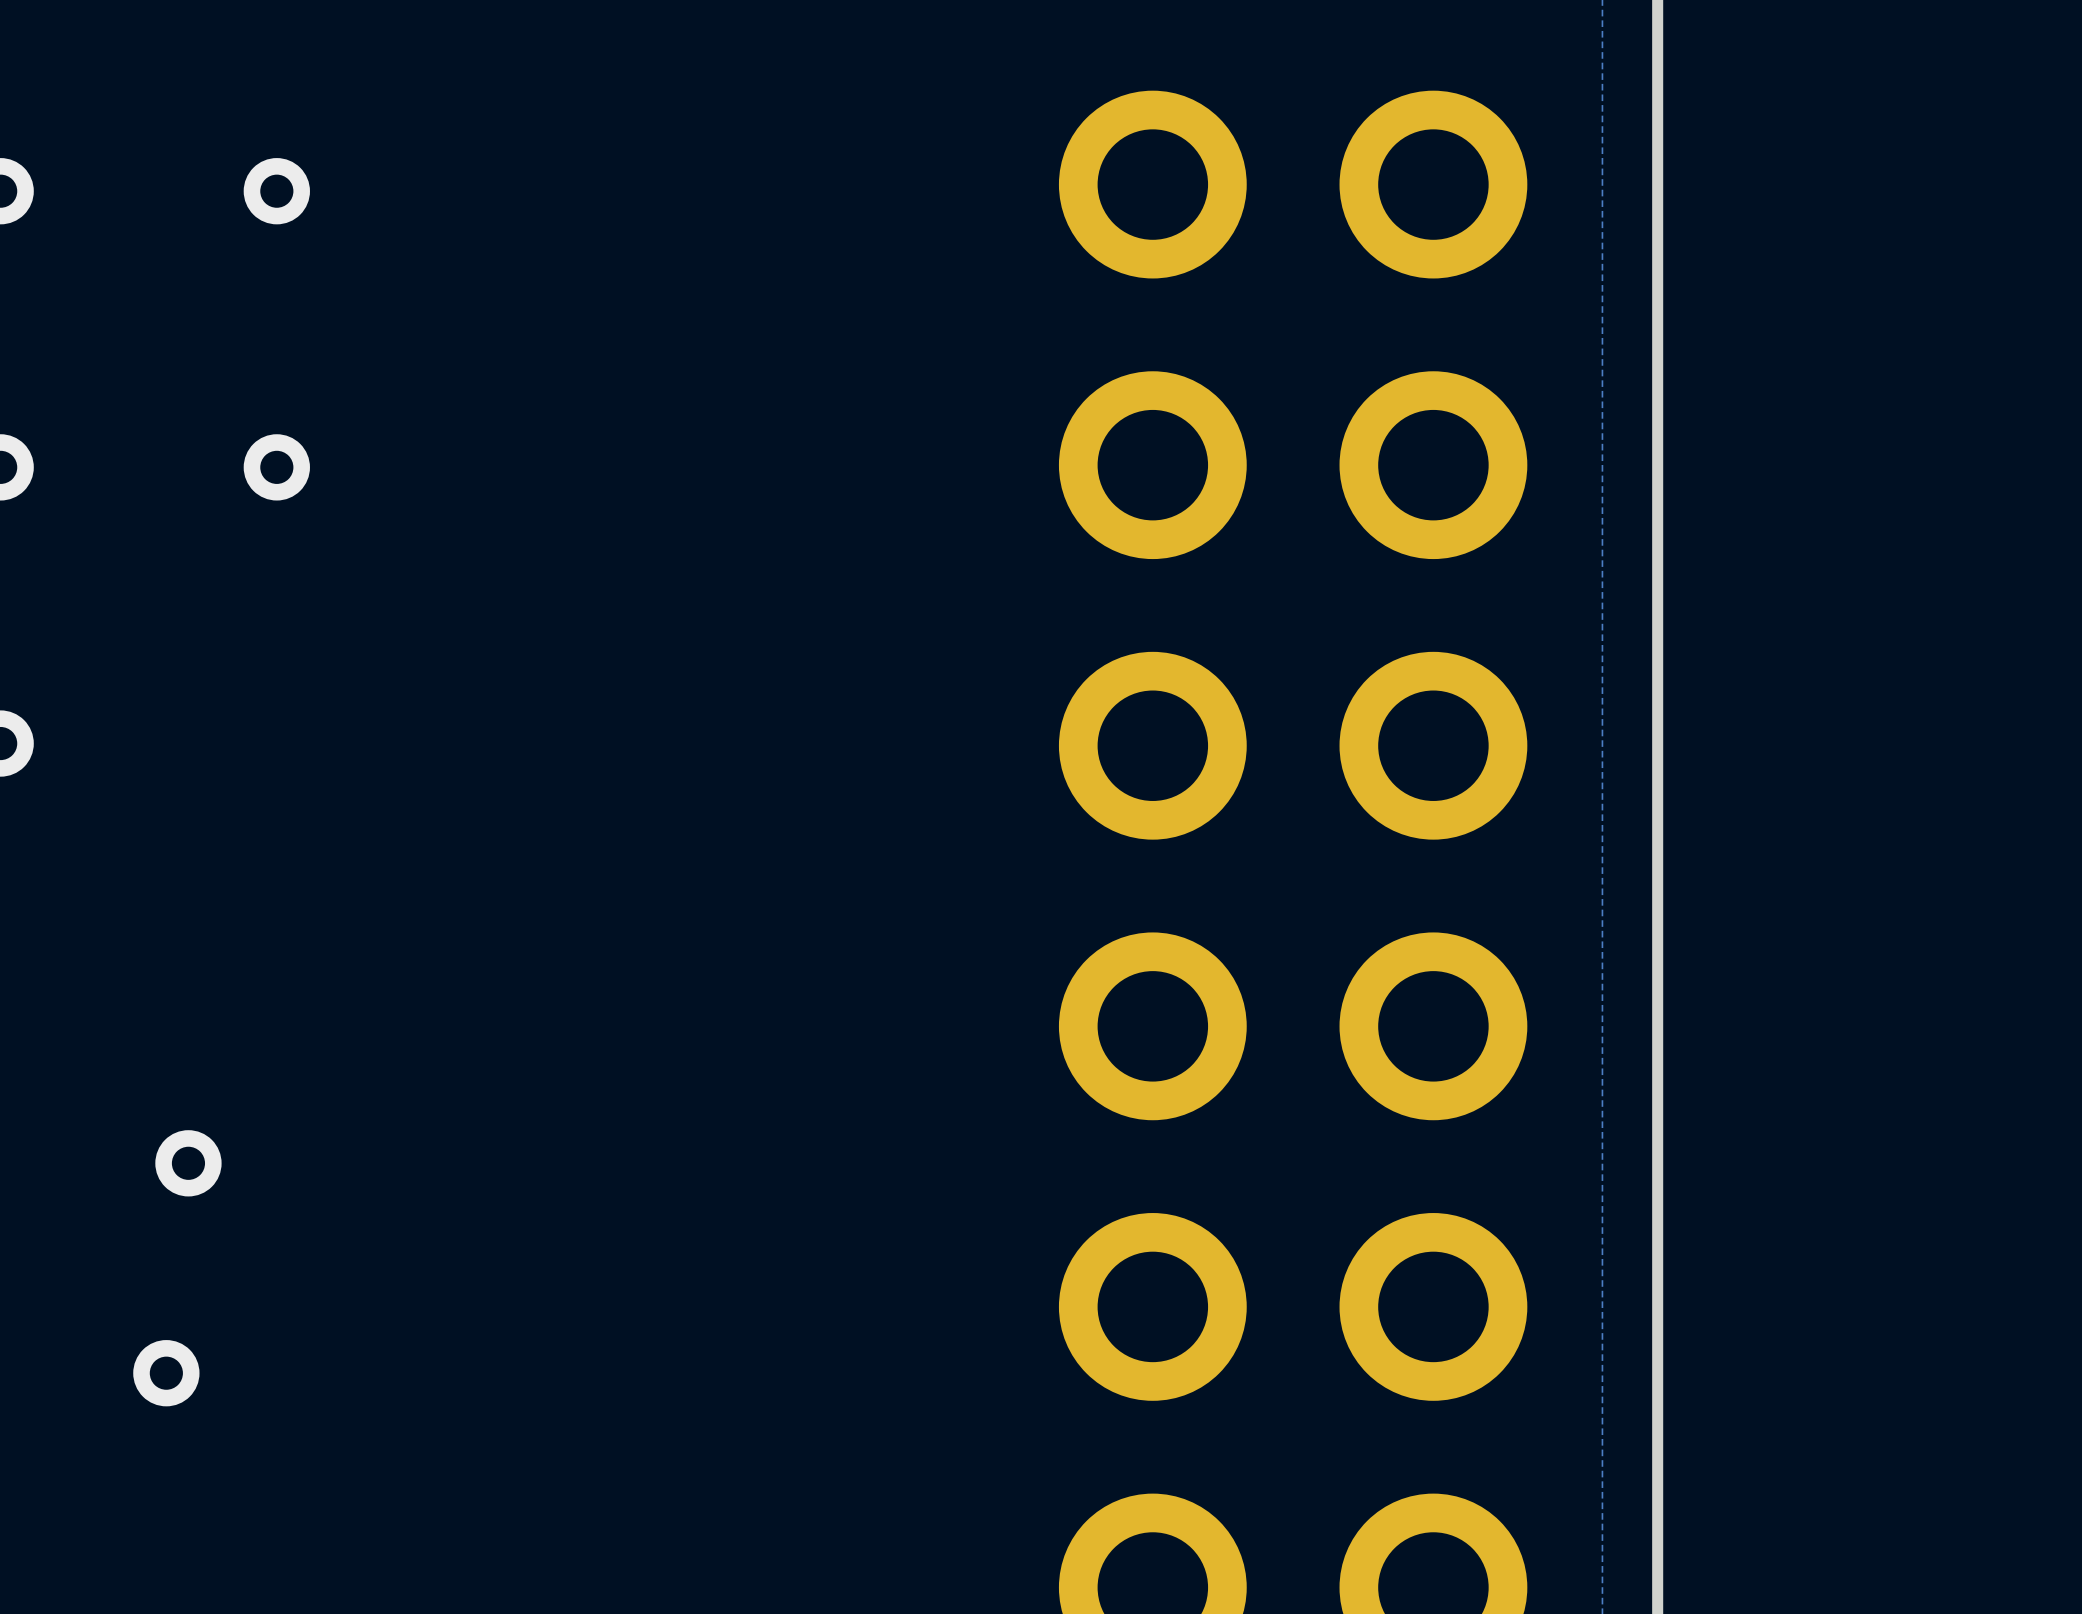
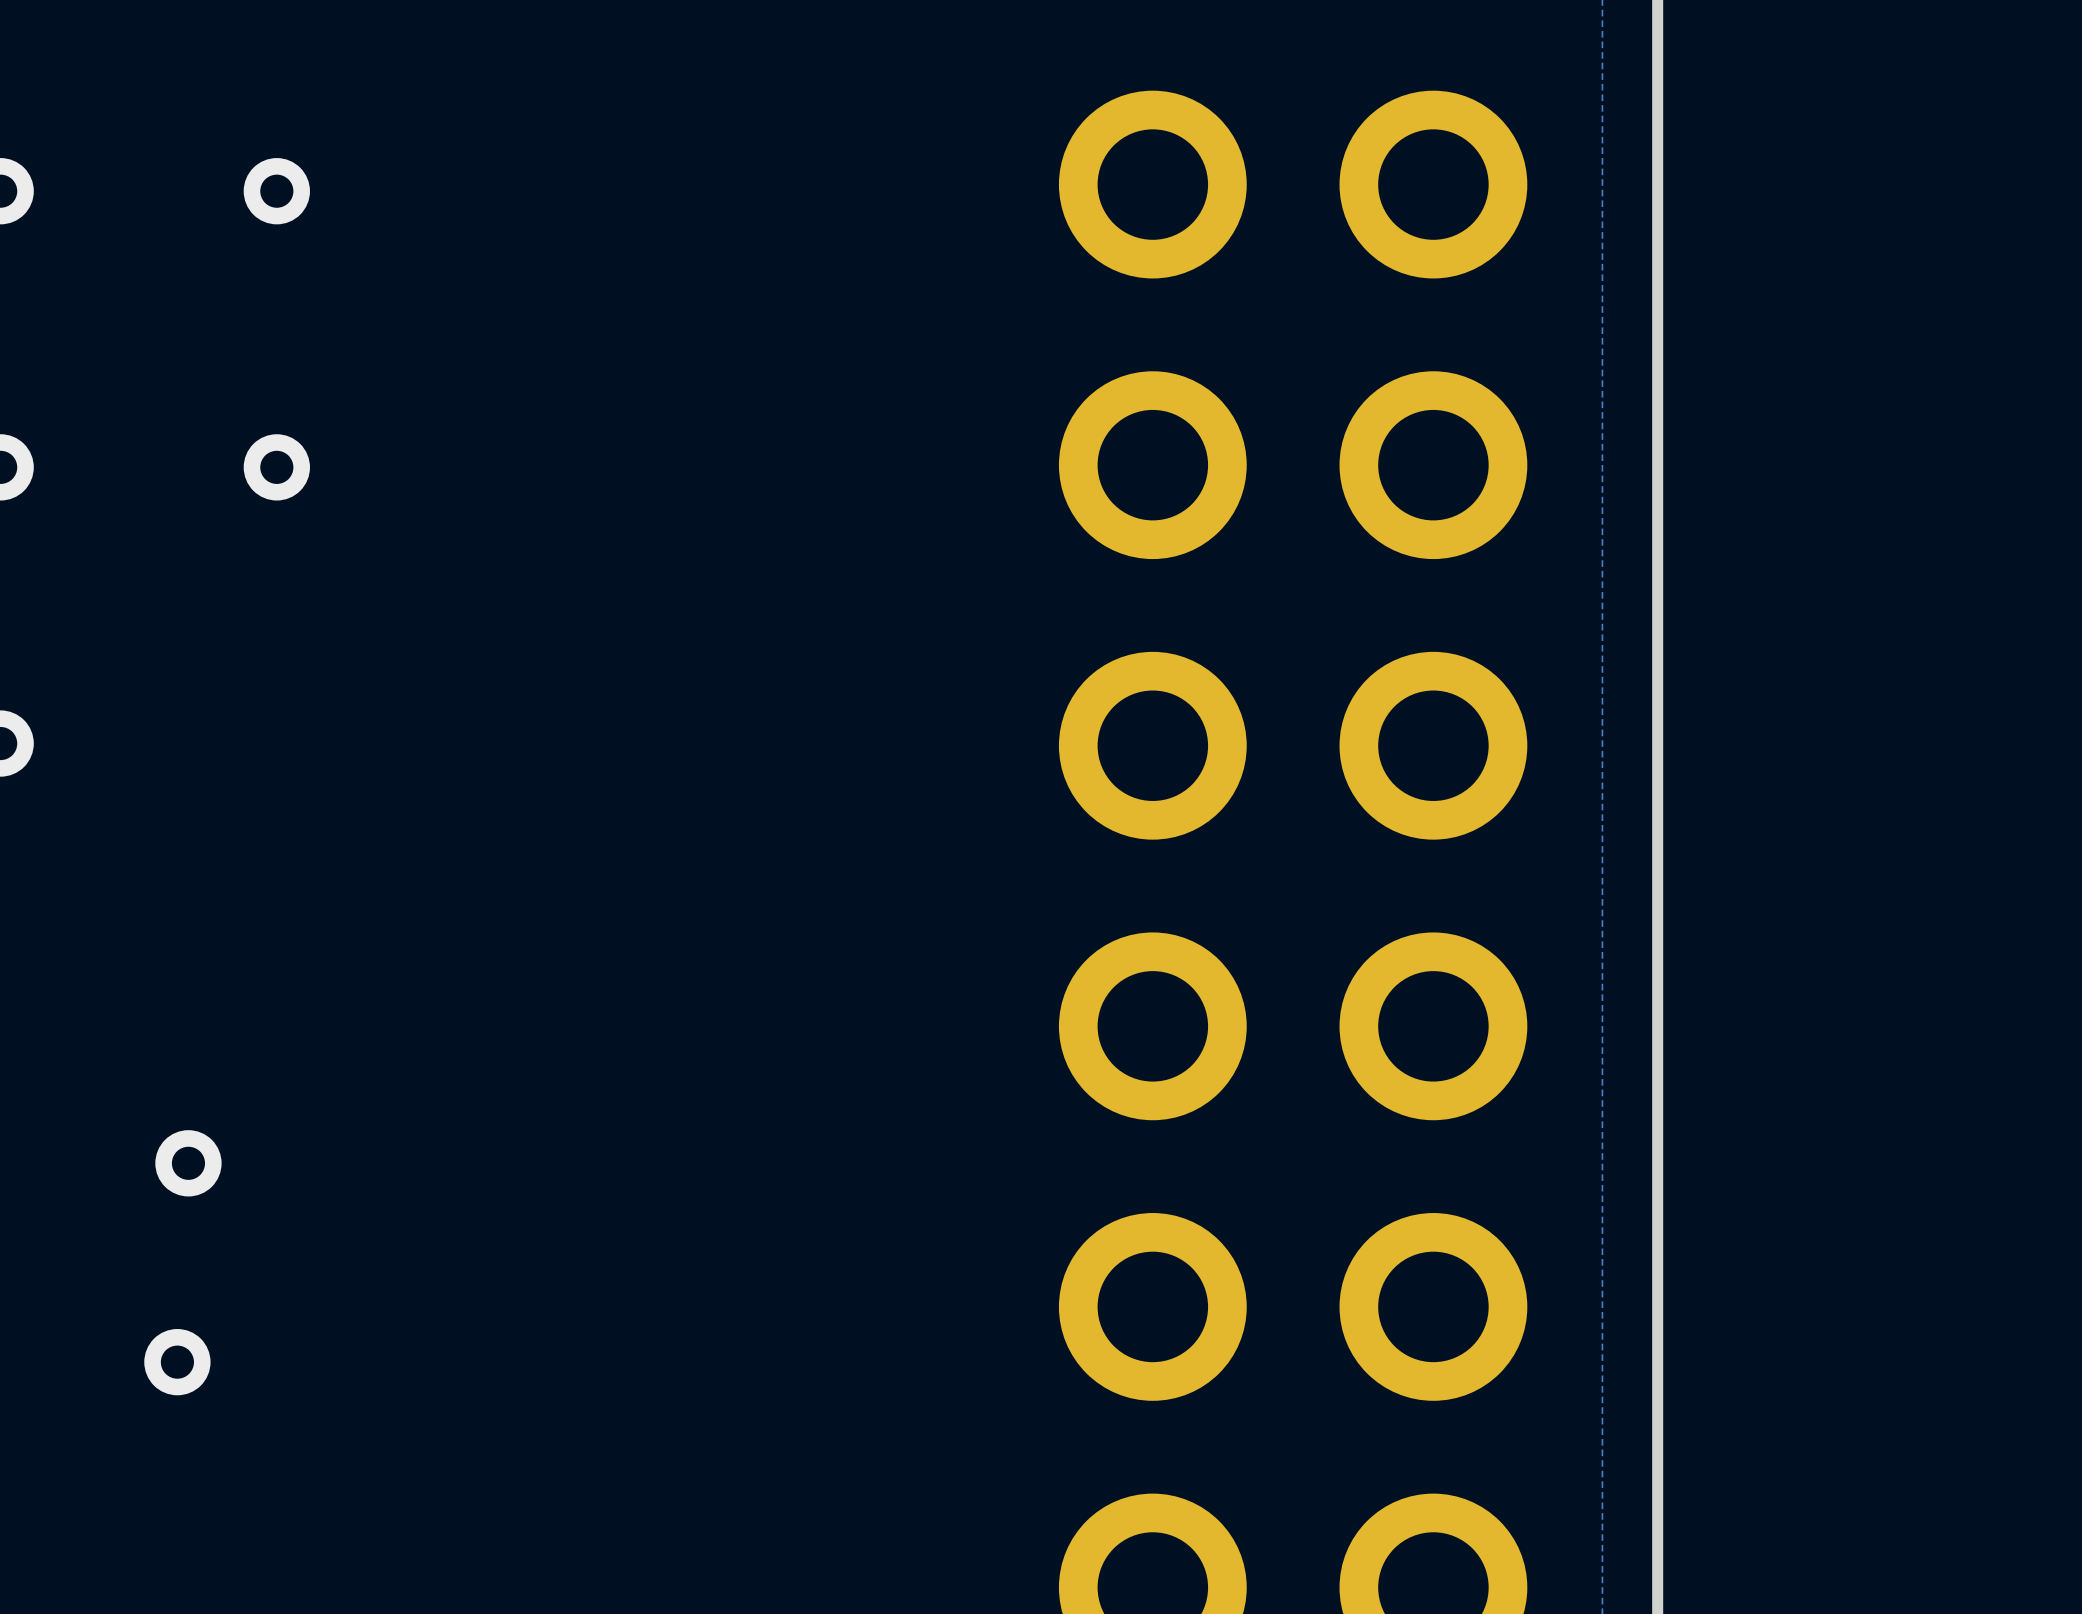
via position: (166, 1373) -> (177, 1362)

